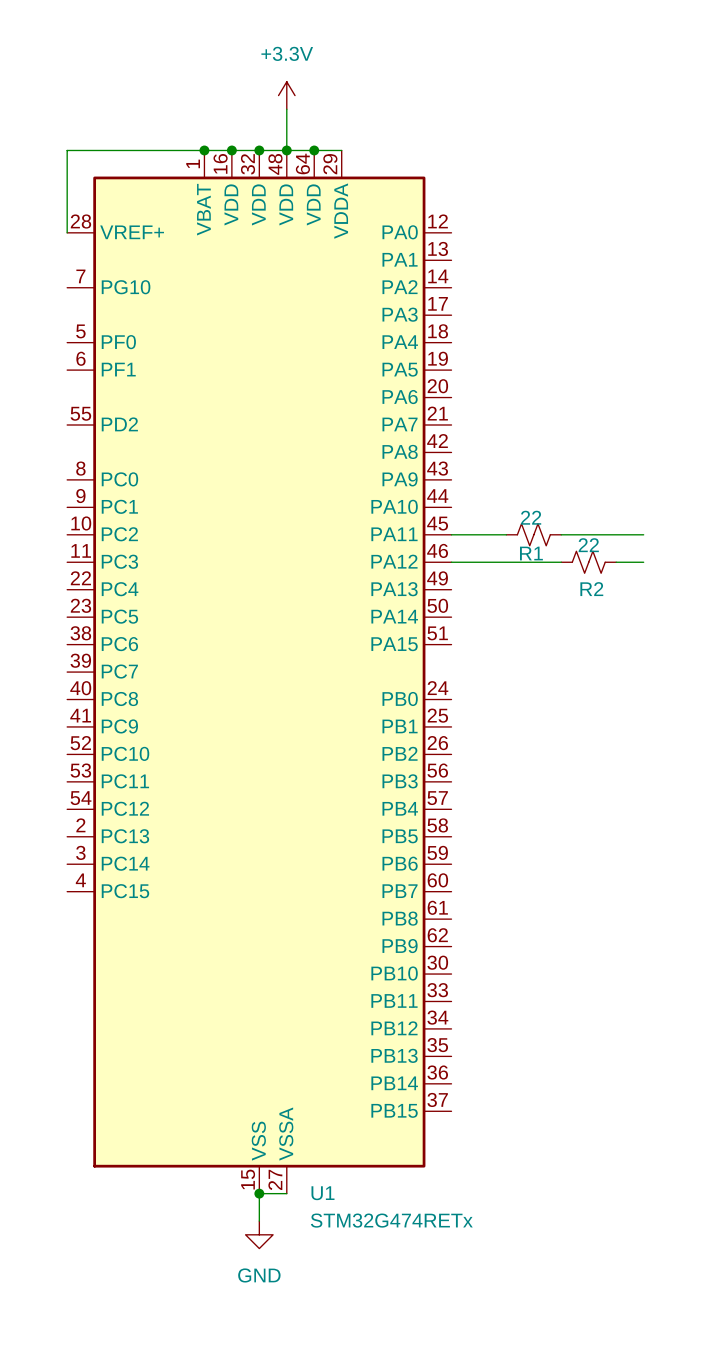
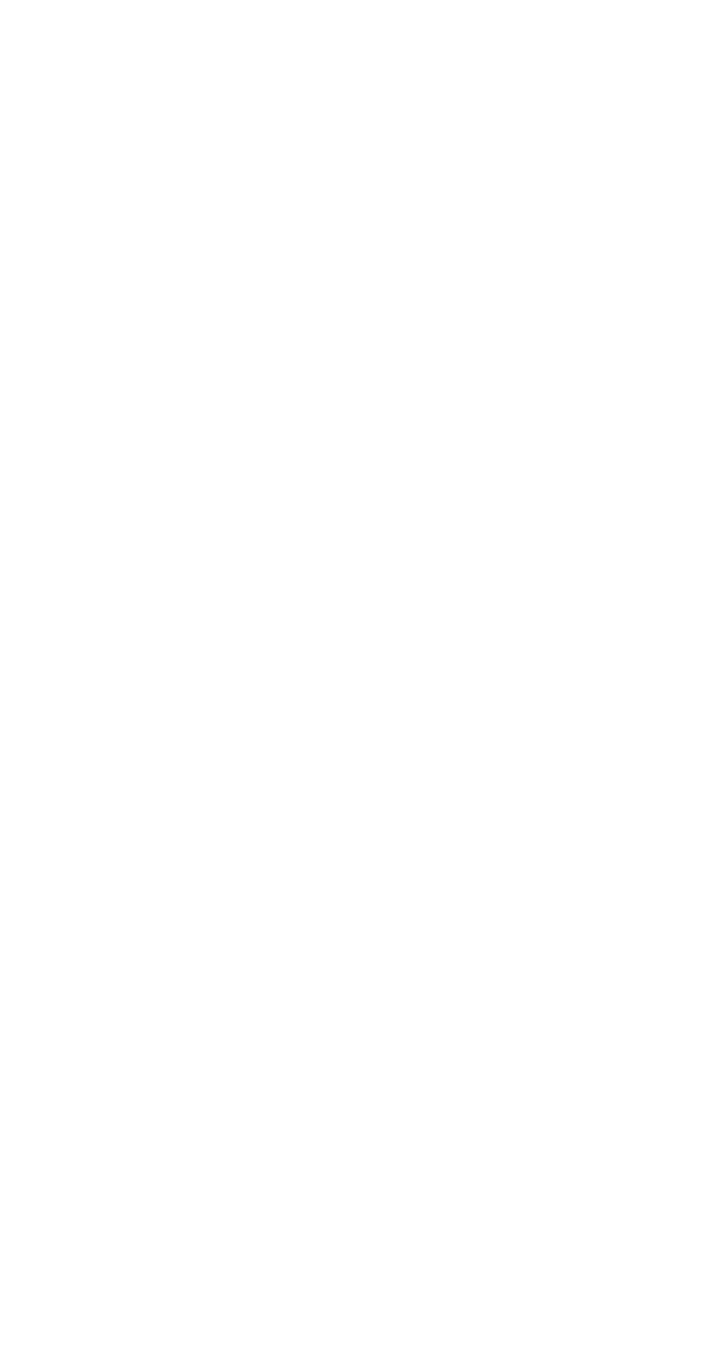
power symbol: +3.3V (286, 95) -> none
wire: (286, 109) (286, 150) -> none
junction: (204, 150) -> none
junction: (231, 150) -> none
junction: (259, 150) -> none
junction: (286, 150) -> none
junction: (314, 150) -> none
wire: (341, 150) (67, 150) (67, 232) -> none
wire: (451, 534) (506, 534) -> none
R1: 22 (533, 534) -> none
wire: (561, 534) (643, 534) -> none
wire: (451, 562) (561, 562) -> none
R2: 22 (588, 562) -> none
wire: (616, 562) (643, 562) -> none
U1: STM32G474RETx (259, 672) -> none
junction: (259, 1193) -> none
wire: (286, 1193) (259, 1193) (259, 1221) -> none
power symbol: GND (259, 1234) -> none

